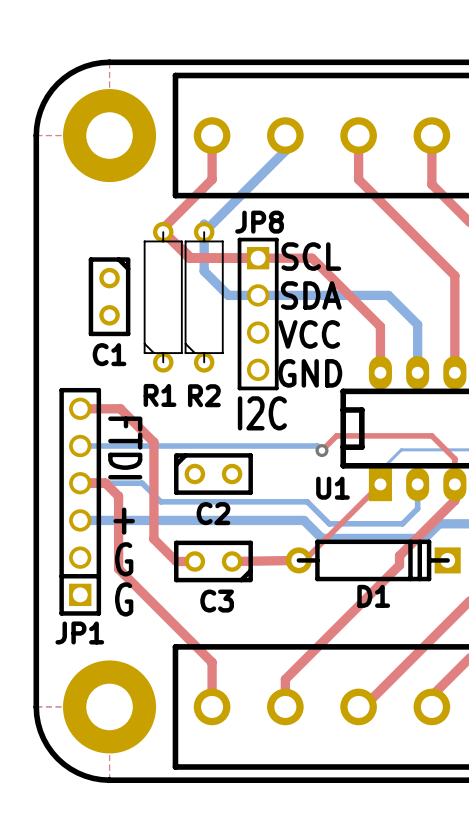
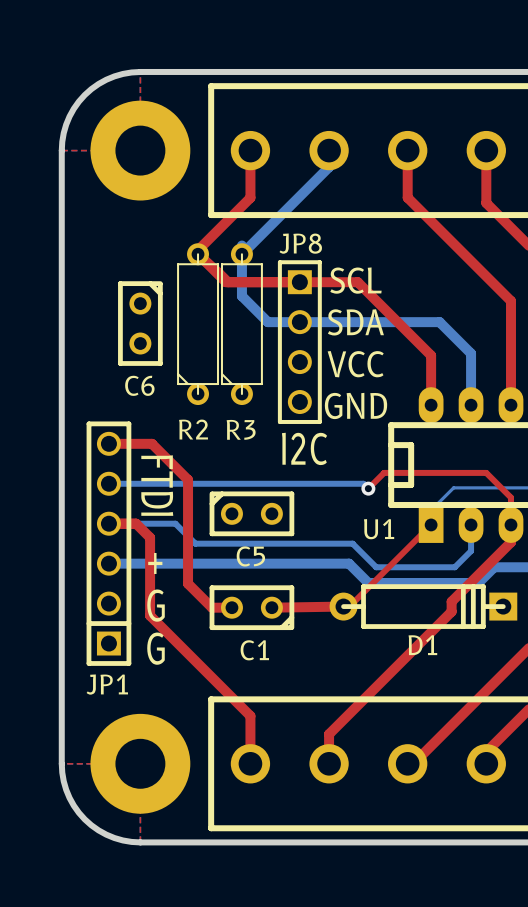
C1 name: C1 (109, 354) -> C6 (139, 385)
R1 name: R1 (160, 395) -> R2 (193, 429)
R2 name: R2 (204, 395) -> R3 (241, 429)
C2 name: C2 (213, 513) -> C5 (250, 556)
C3 name: C3 (217, 601) -> C1 (254, 650)

